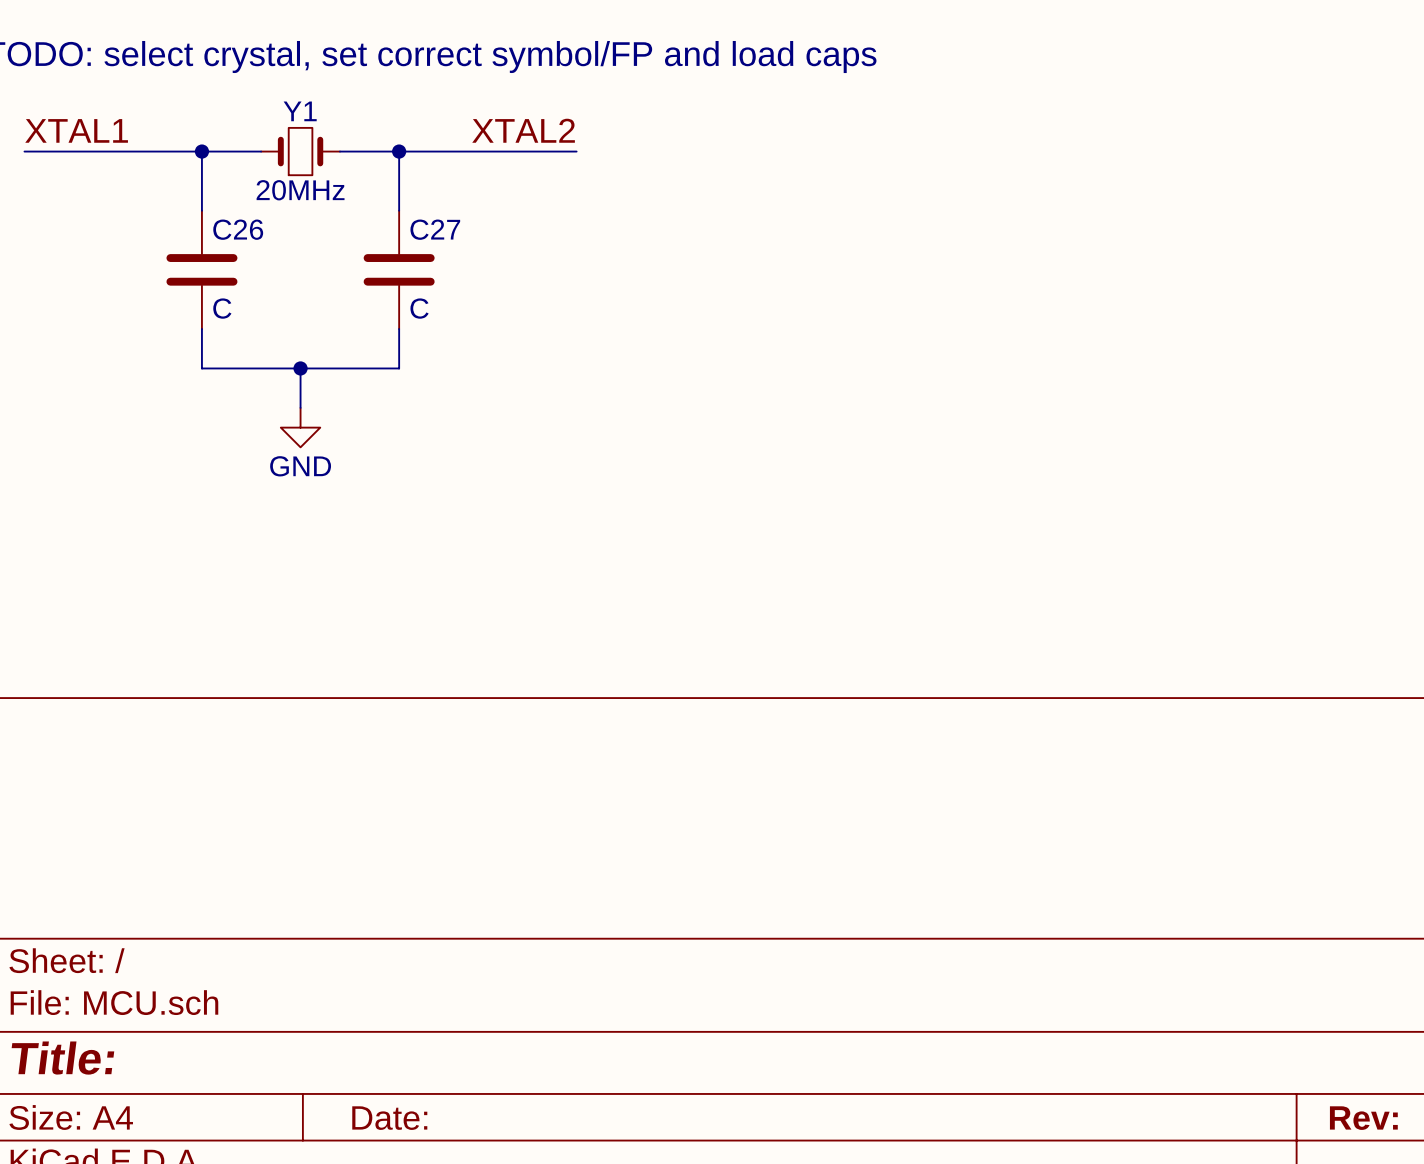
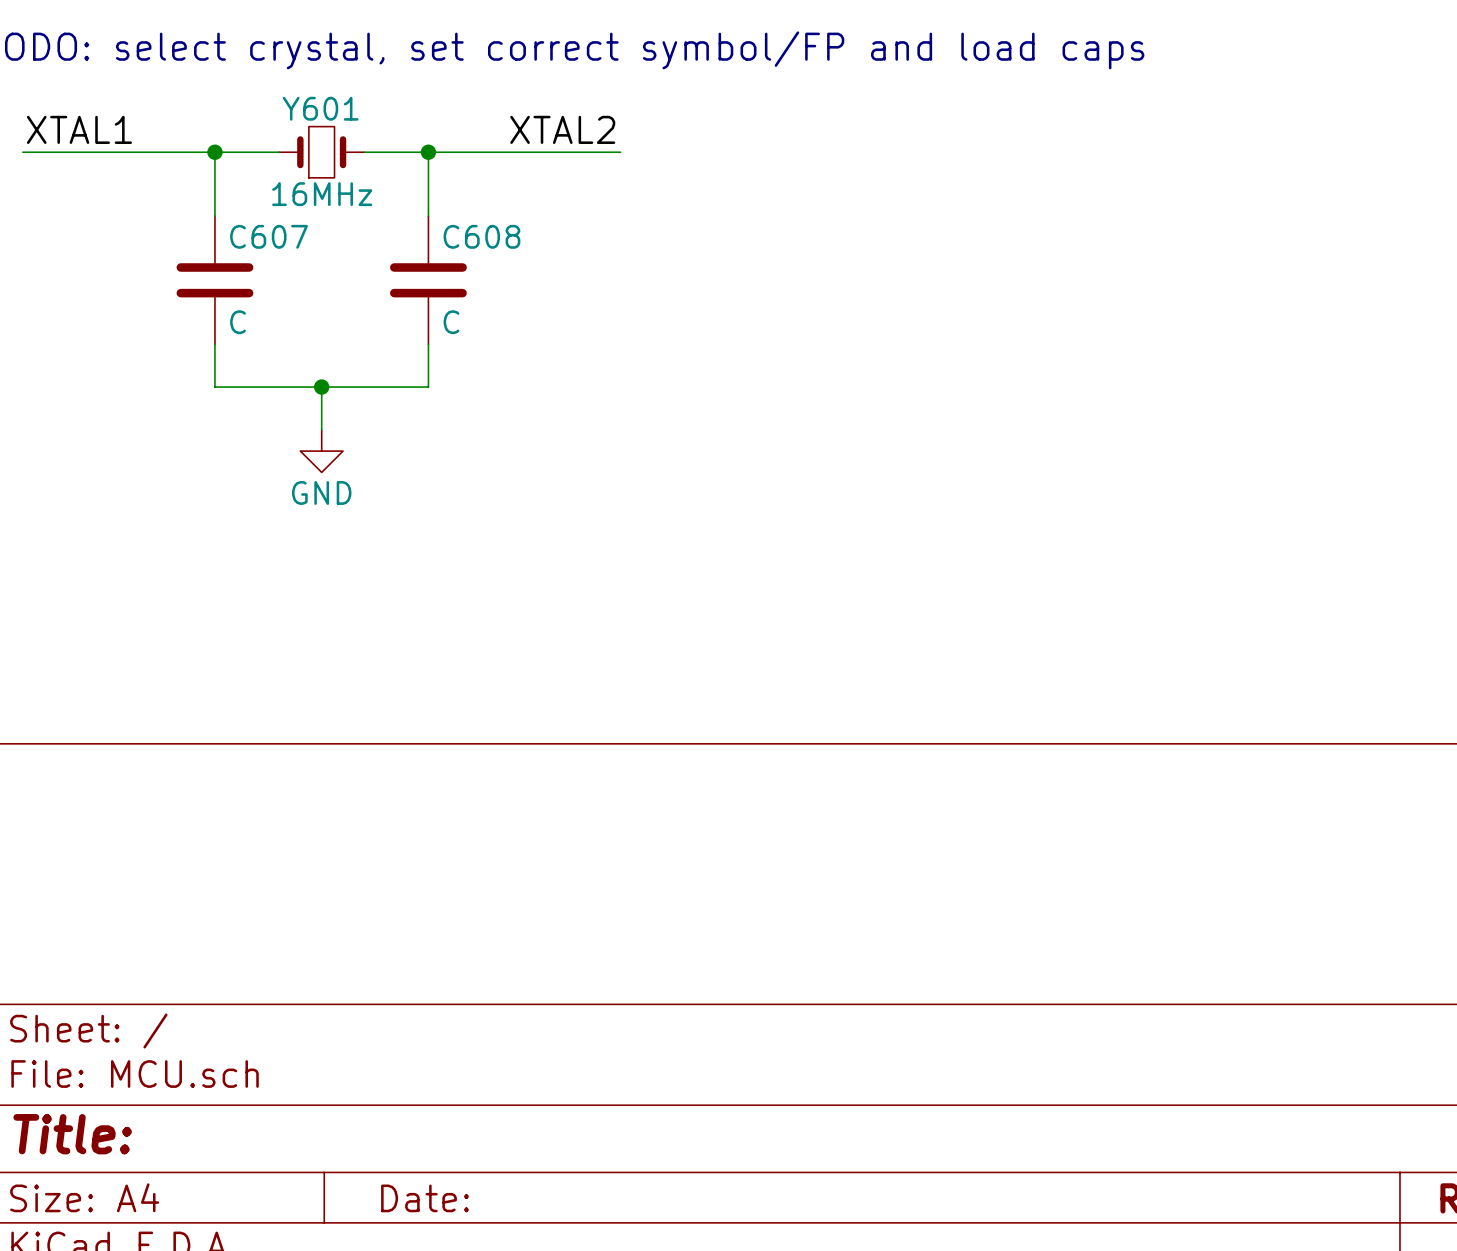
Y1 name: Y1 (300, 111) -> Y601 (320, 108)
Y1 value: 20MHz (300, 190) -> 16MHz (322, 194)
C26 name: C26 (238, 229) -> C607 (269, 236)
C27 name: C27 (435, 229) -> C608 (481, 236)

